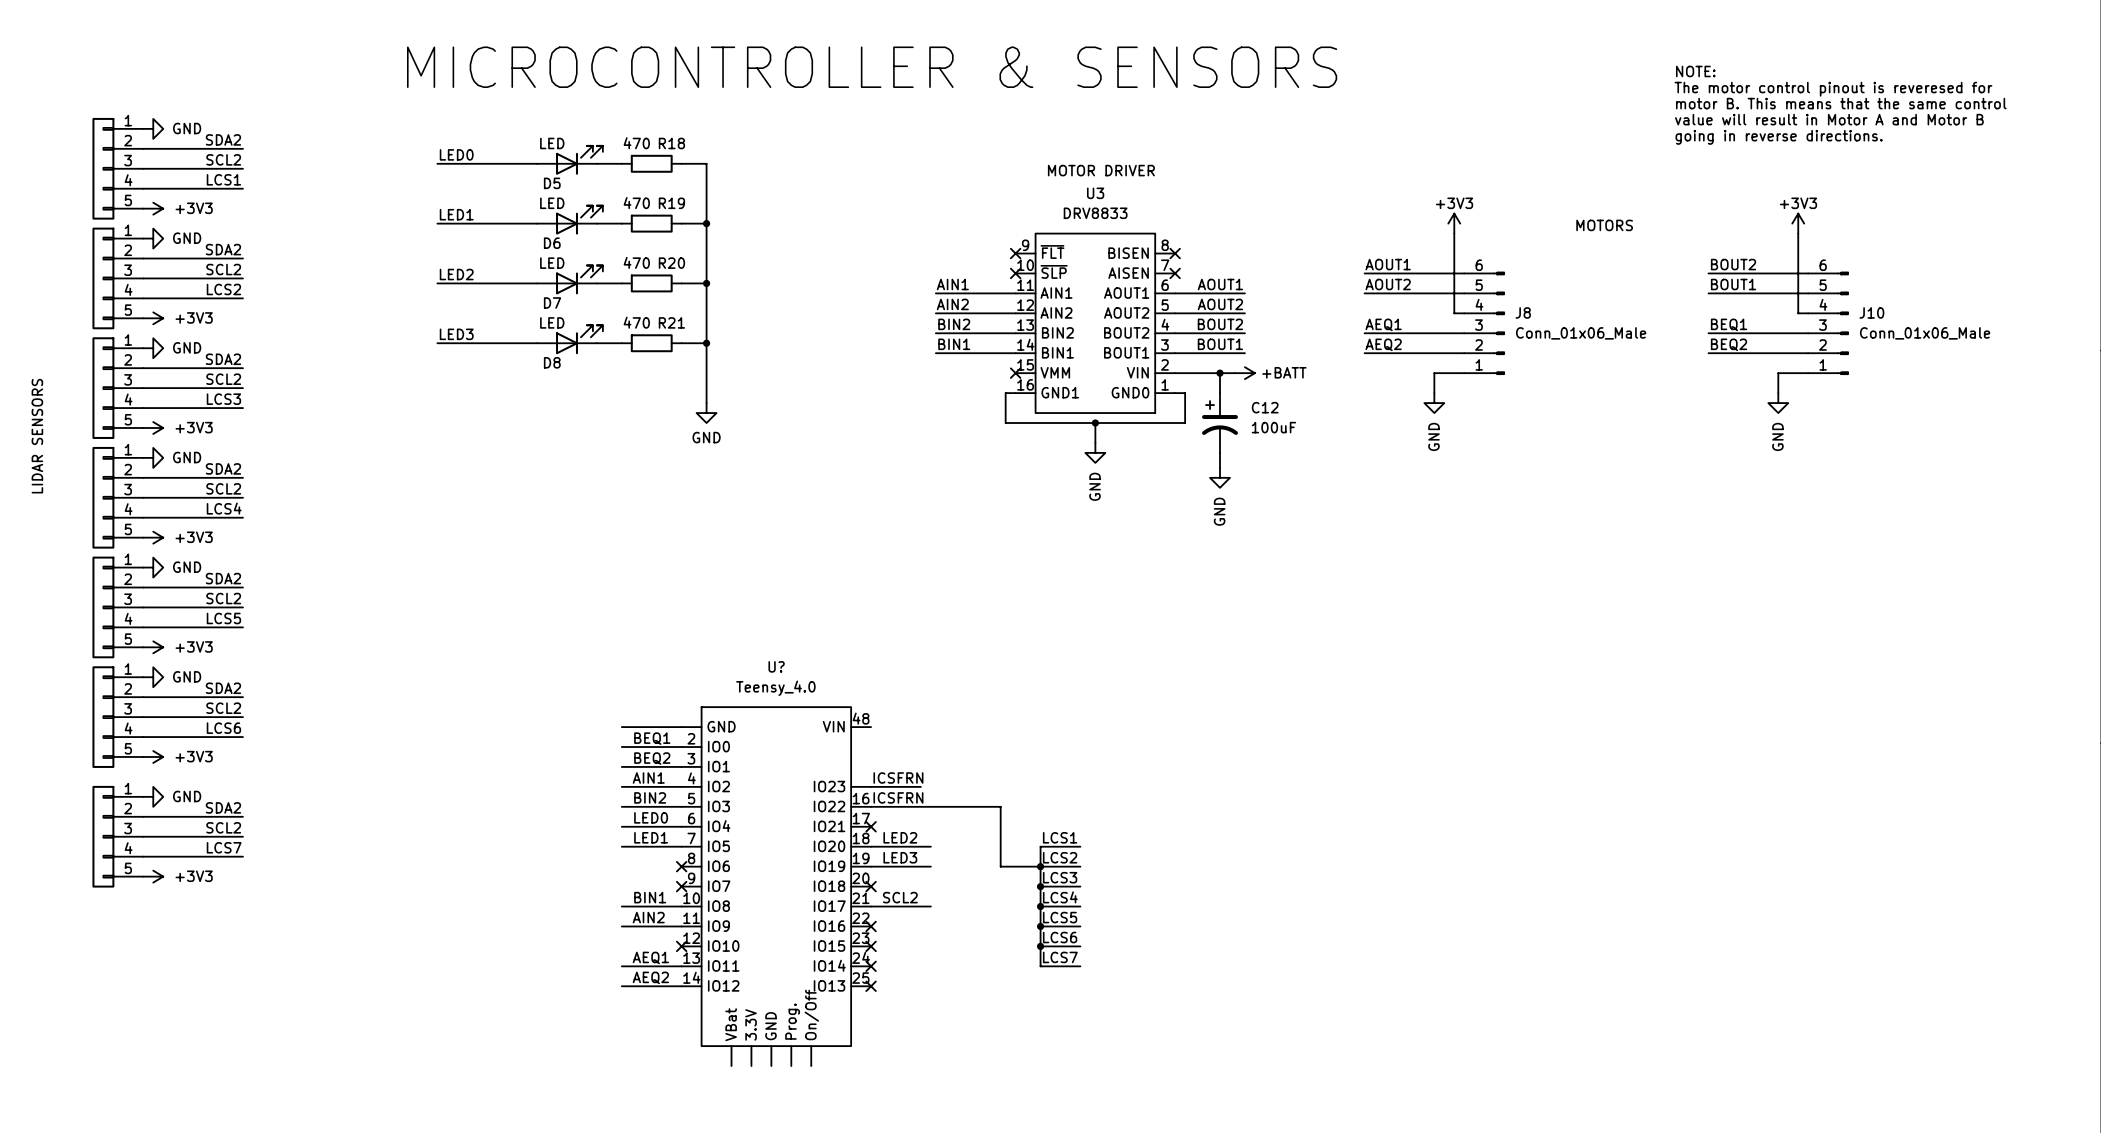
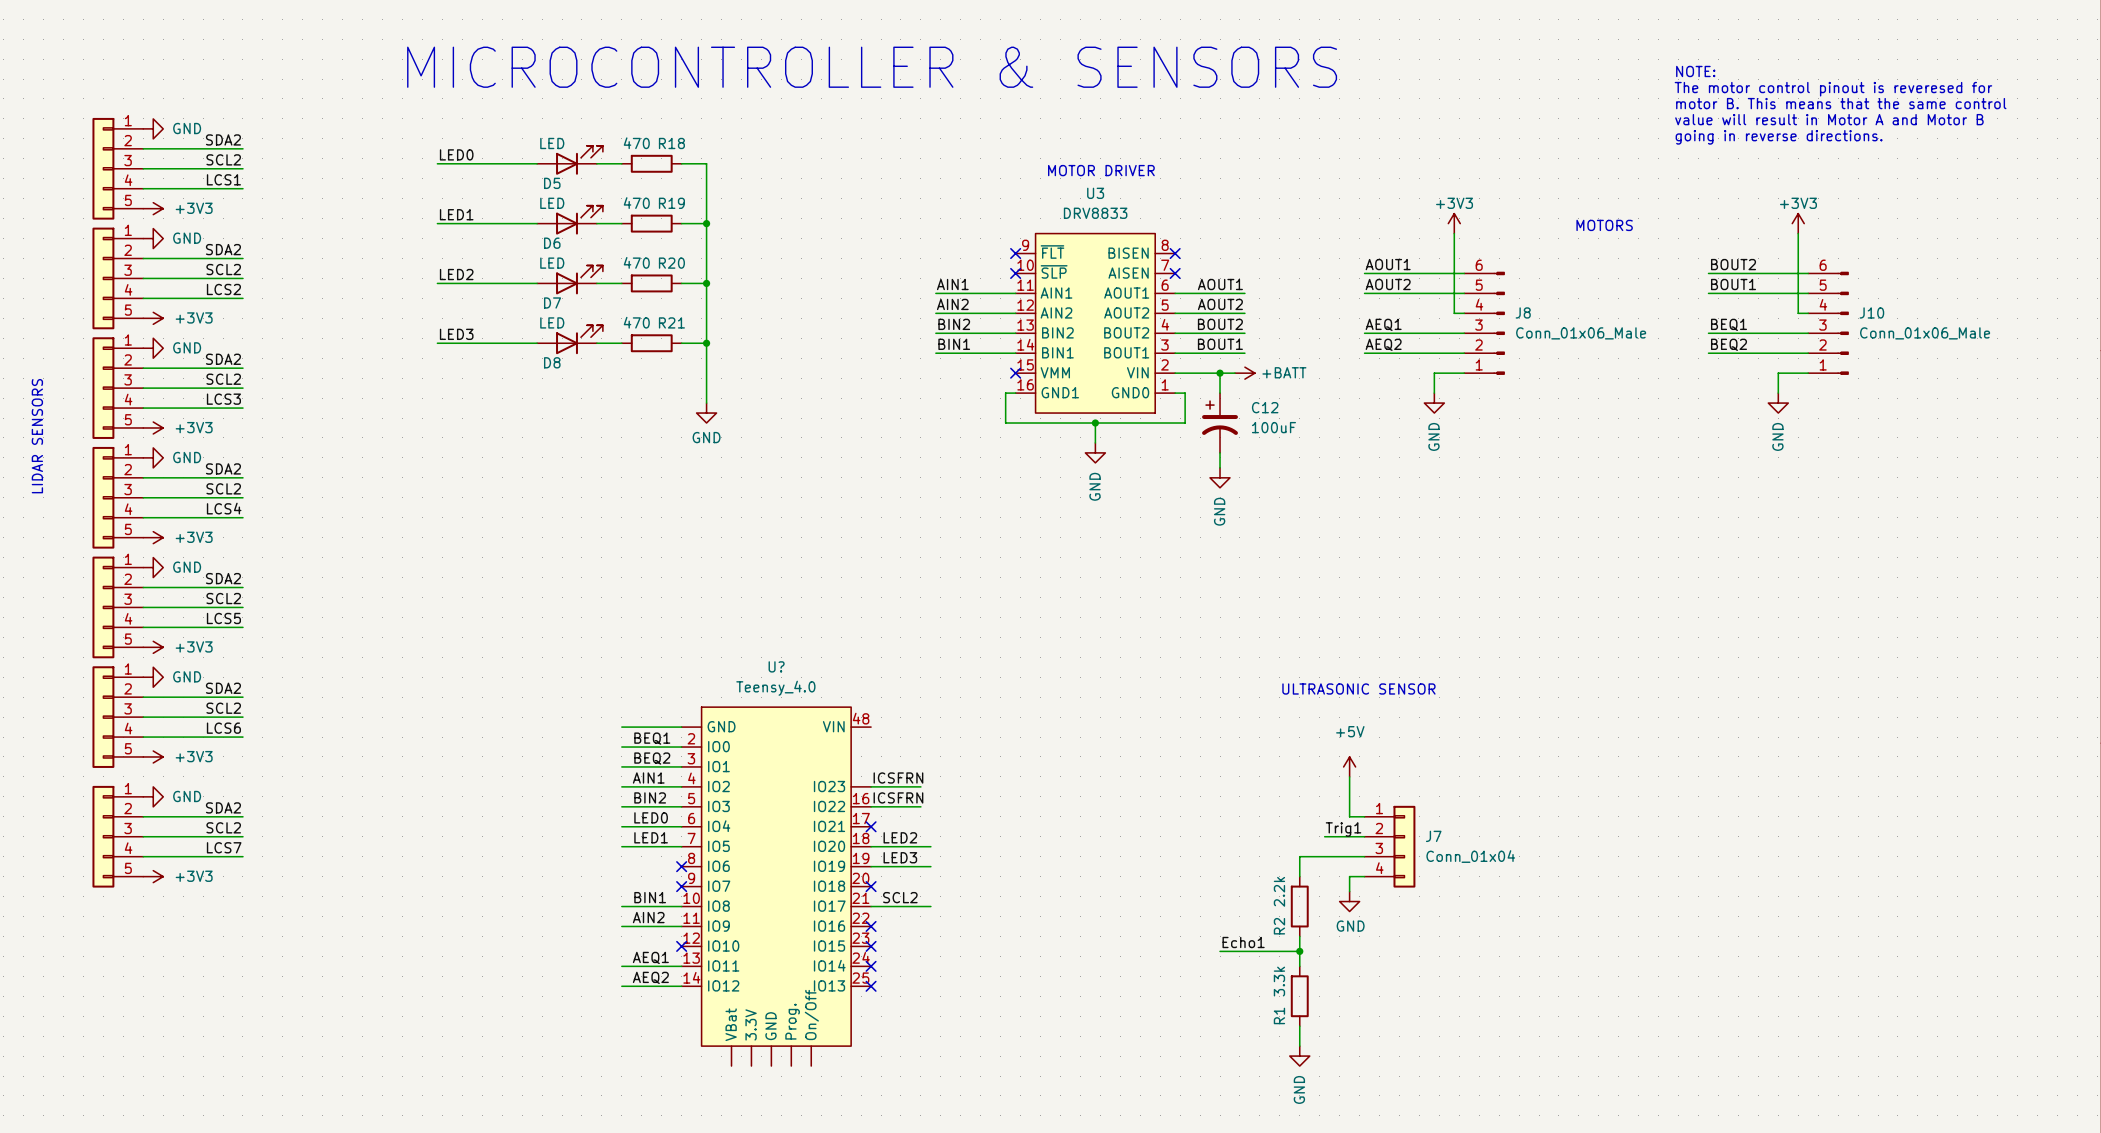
text: none -> ULTRASONIC SENSOR (1358, 689)
power symbol: none -> +5V (1349, 766)
wire: none -> (1349, 776) (1349, 816) (1364, 816)
wire: (920, 806) (1000, 806) (1000, 866) (1080, 866) -> none
label: none -> Trig1 (1343, 829)
wire: none -> (1324, 836) (1364, 836)
label: LCS1 (1060, 837) -> none
wire: (1080, 846) (1040, 846) (1040, 966) (1080, 966) -> none
J7: none -> Conn_01x04 (1389, 846)
wire: none -> (1364, 856) (1299, 856) (1299, 876)
label: LCS2 (1060, 857) -> none
junction: (1040, 866) -> none
wire: none -> (1364, 876) (1349, 876) (1349, 891)
label: LCS3 (1060, 877) -> none
wire: (1040, 886) (1080, 886) -> none
junction: (1040, 886) -> none
label: LCS4 (1060, 897) -> none
power symbol: none -> GND (1349, 901)
wire: (1040, 906) (1080, 906) -> none
junction: (1040, 906) -> none
R2: none -> 2.2k (1299, 906)
label: LCS5 (1060, 917) -> none
wire: (1040, 926) (1080, 926) -> none
junction: (1040, 926) -> none
wire: none -> (1299, 936) (1299, 966)
label: LCS6 (1060, 937) -> none
label: none -> Echo1 (1243, 942)
wire: (1040, 946) (1080, 946) -> none
junction: (1040, 946) -> none
wire: none -> (1220, 951) (1299, 951)
junction: none -> (1299, 951)
label: LCS7 (1060, 957) -> none
R1: none -> 3.3k (1299, 996)
wire: none -> (1299, 1026) (1299, 1046)
power symbol: none -> GND (1299, 1056)

